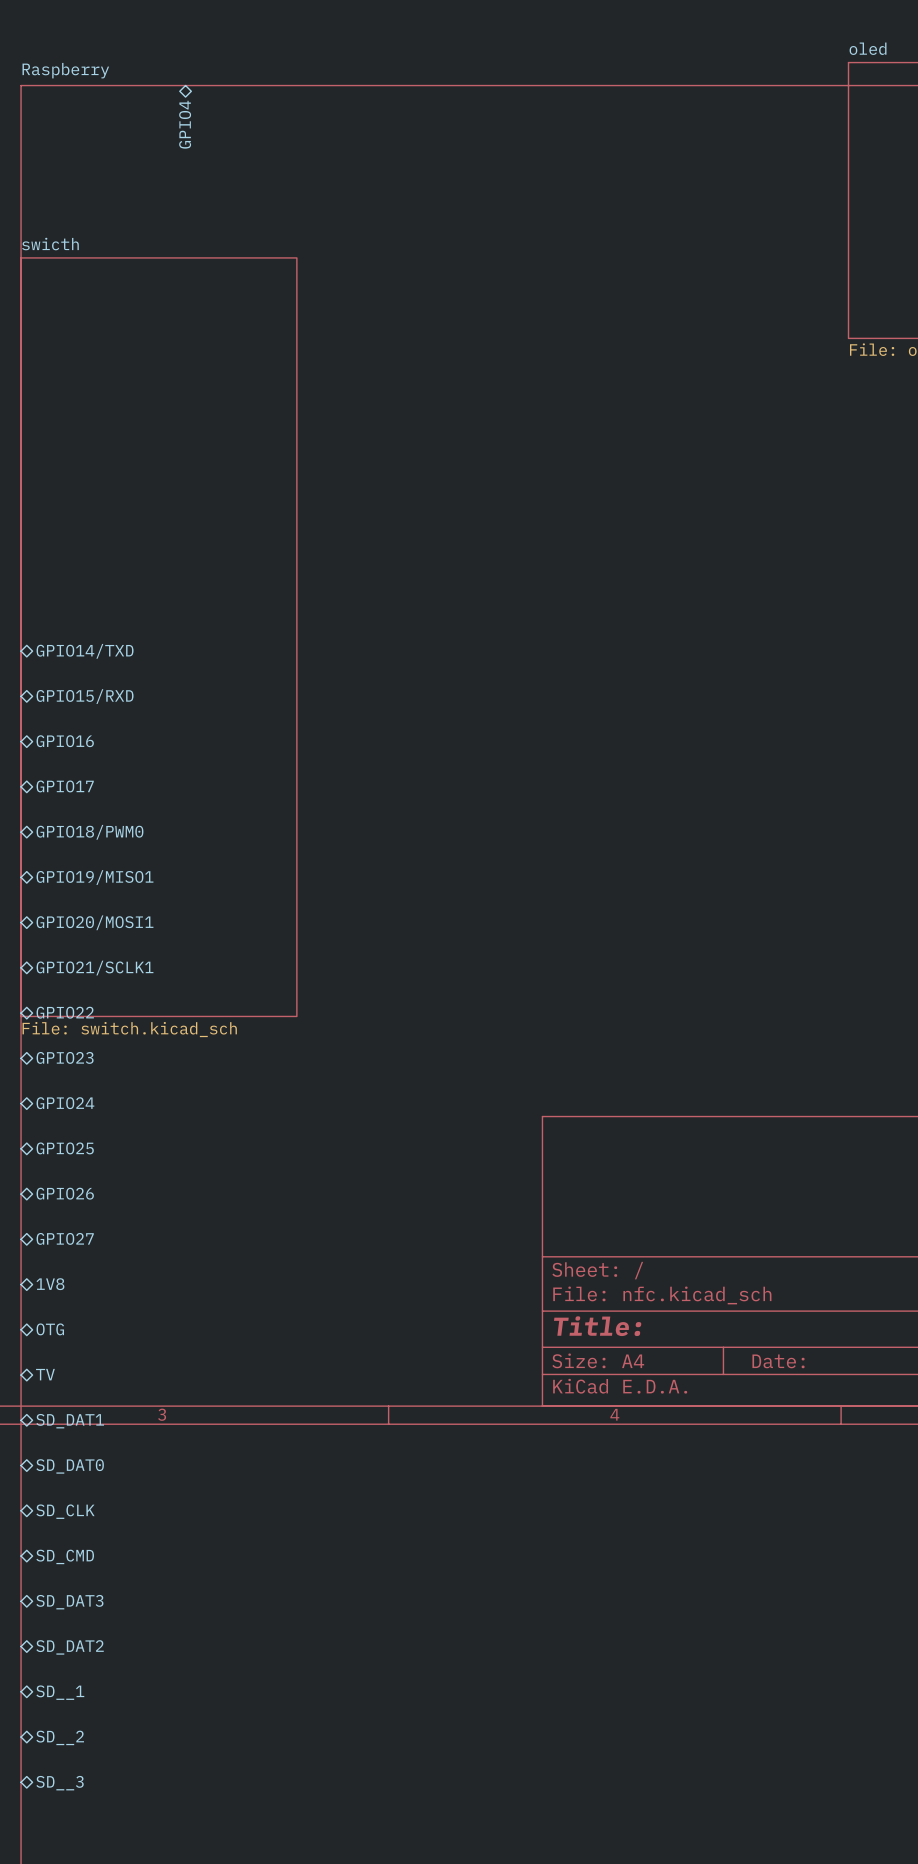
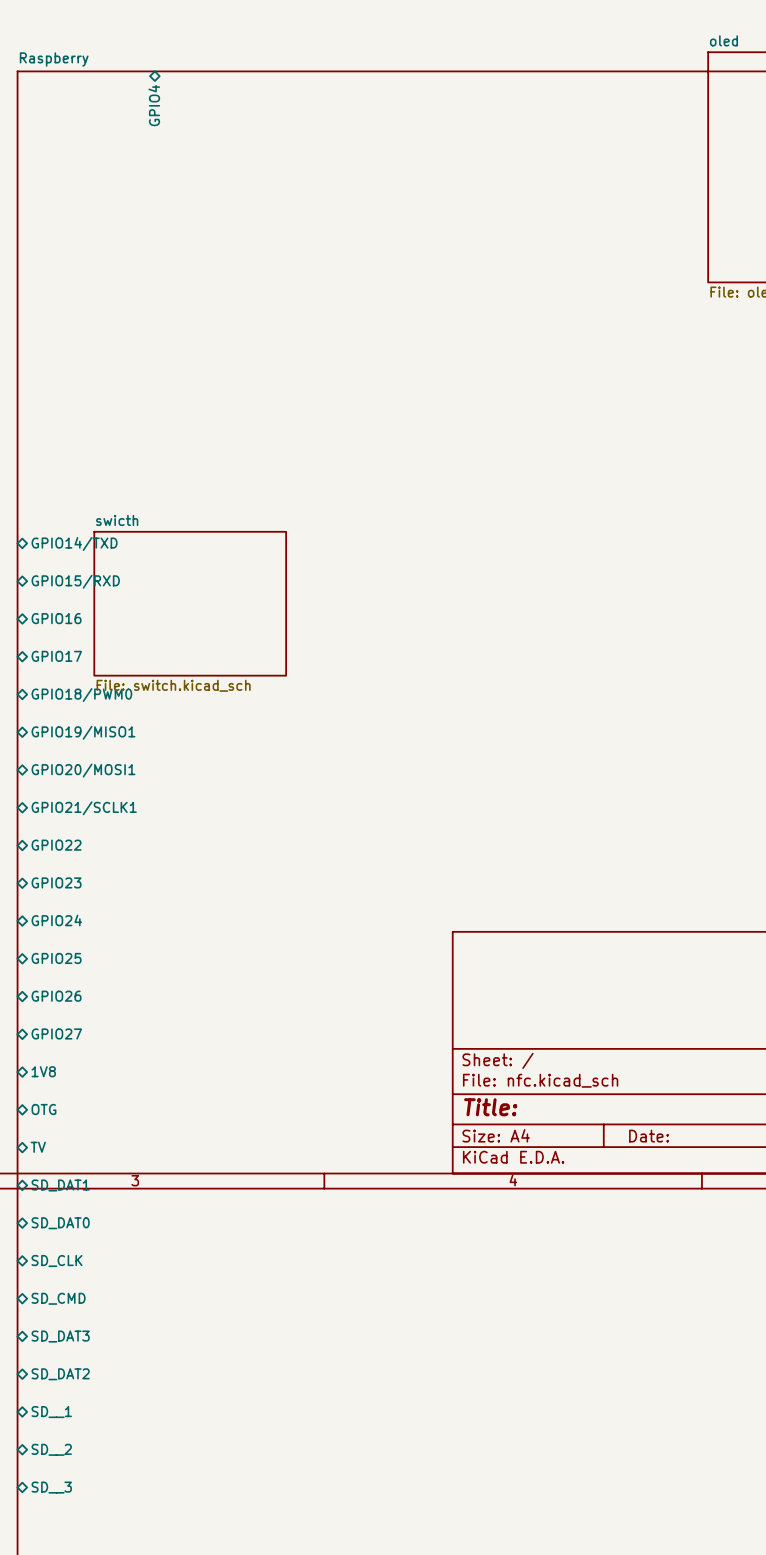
sheet swicth: File: switch.kicad_sch (158, 637) -> none
sheet swicth: none -> File: switch.kicad_sch (190, 603)

